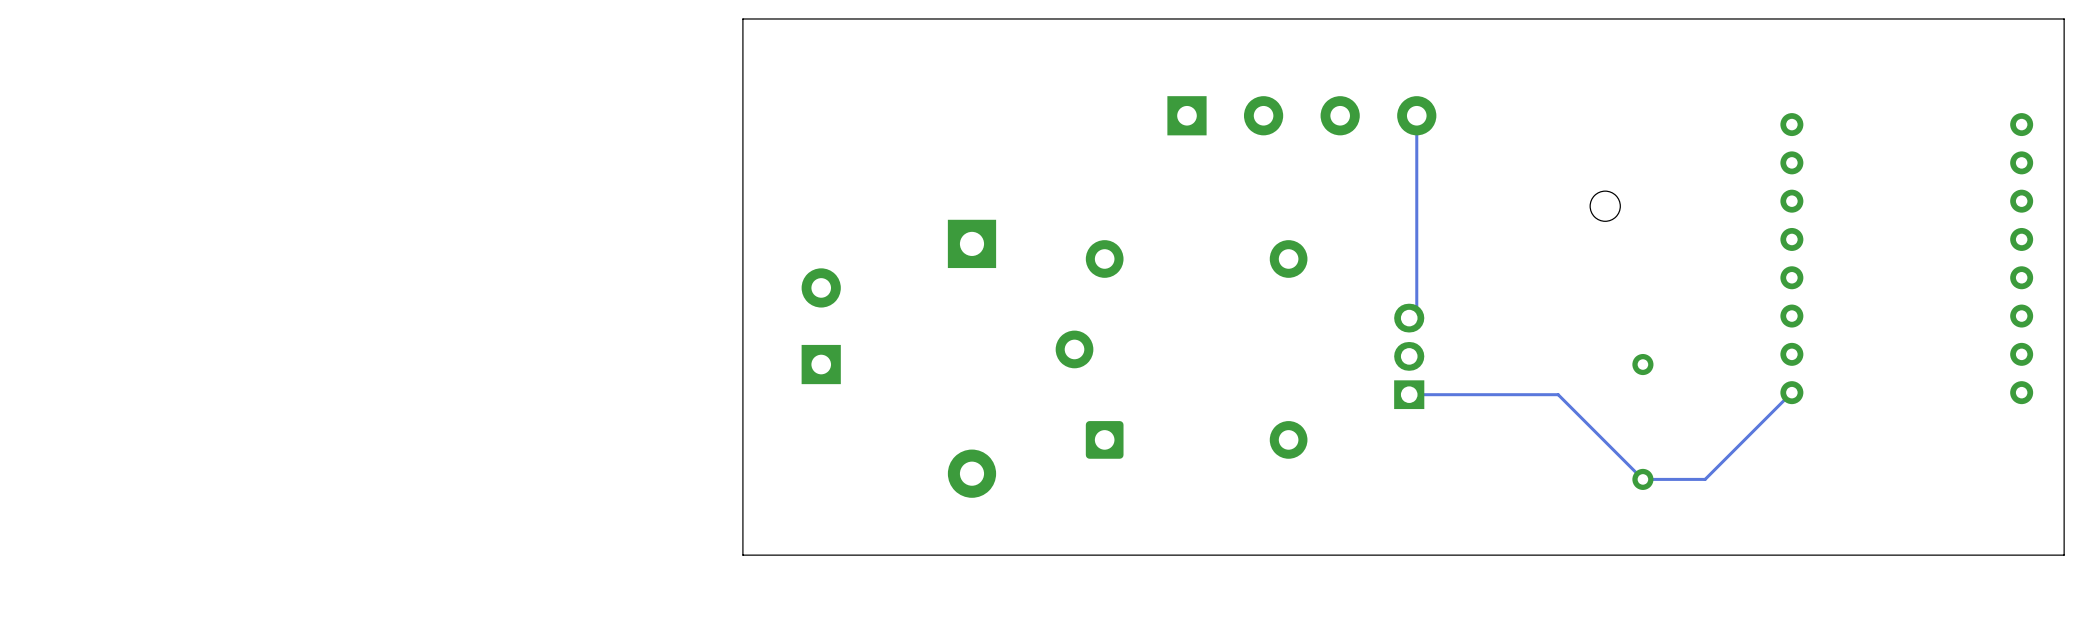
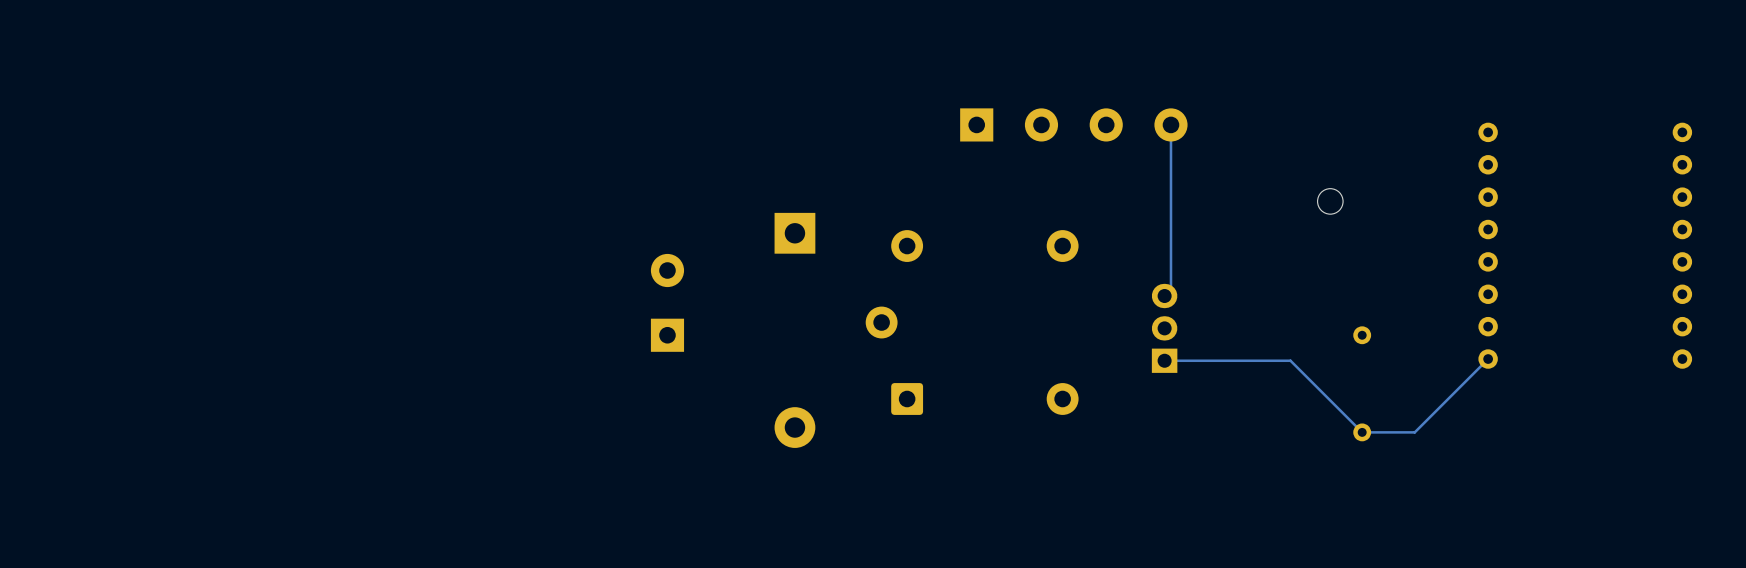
board edge: (2064, 18) (742, 18) (742, 555) (2064, 555) (2064, 18) -> none

